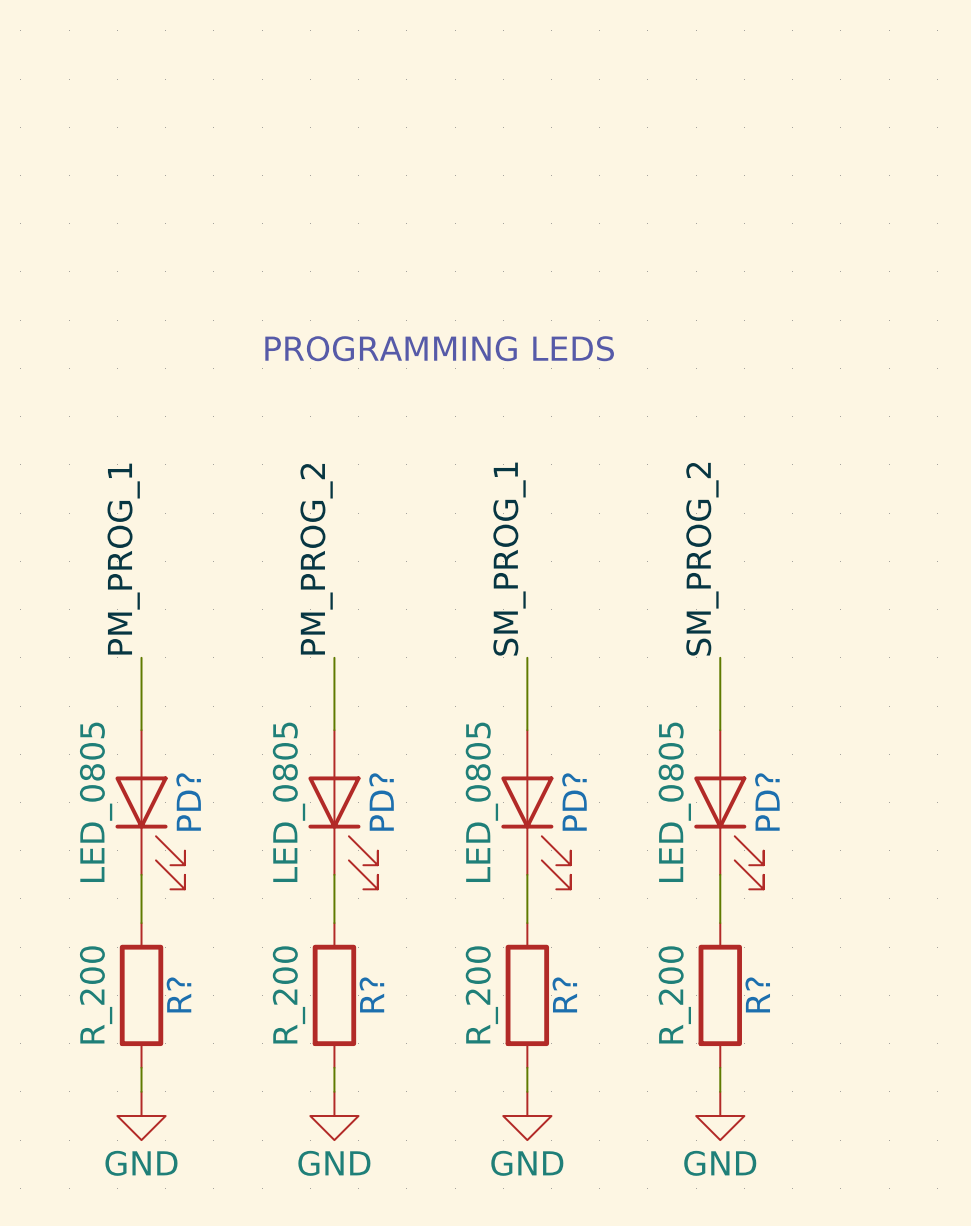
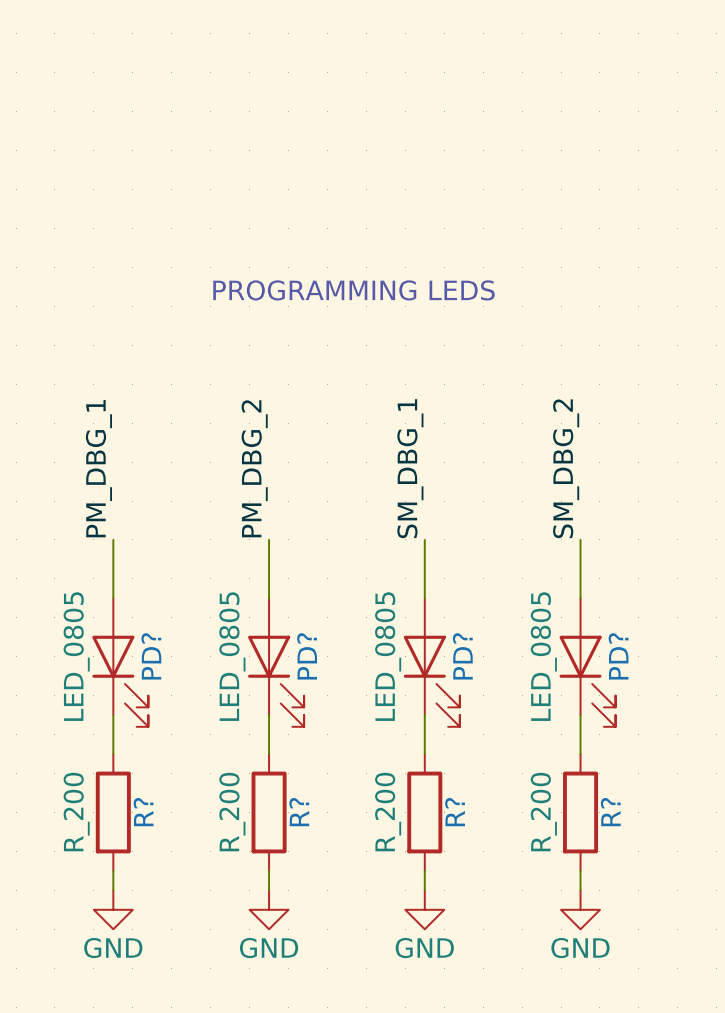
label: PM_PROG_1 (123, 559) -> PM_DBG_1 (98, 468)
label: PM_PROG_2 (316, 559) -> PM_DBG_2 (254, 468)
label: SM_PROG_1 (509, 559) -> SM_DBG_1 (410, 468)
label: SM_PROG_2 (702, 559) -> SM_DBG_2 (566, 468)

